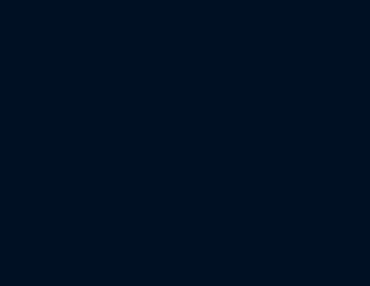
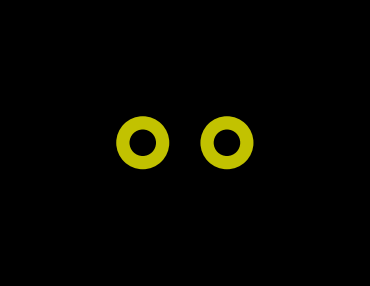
part: none -> (184, 142)

